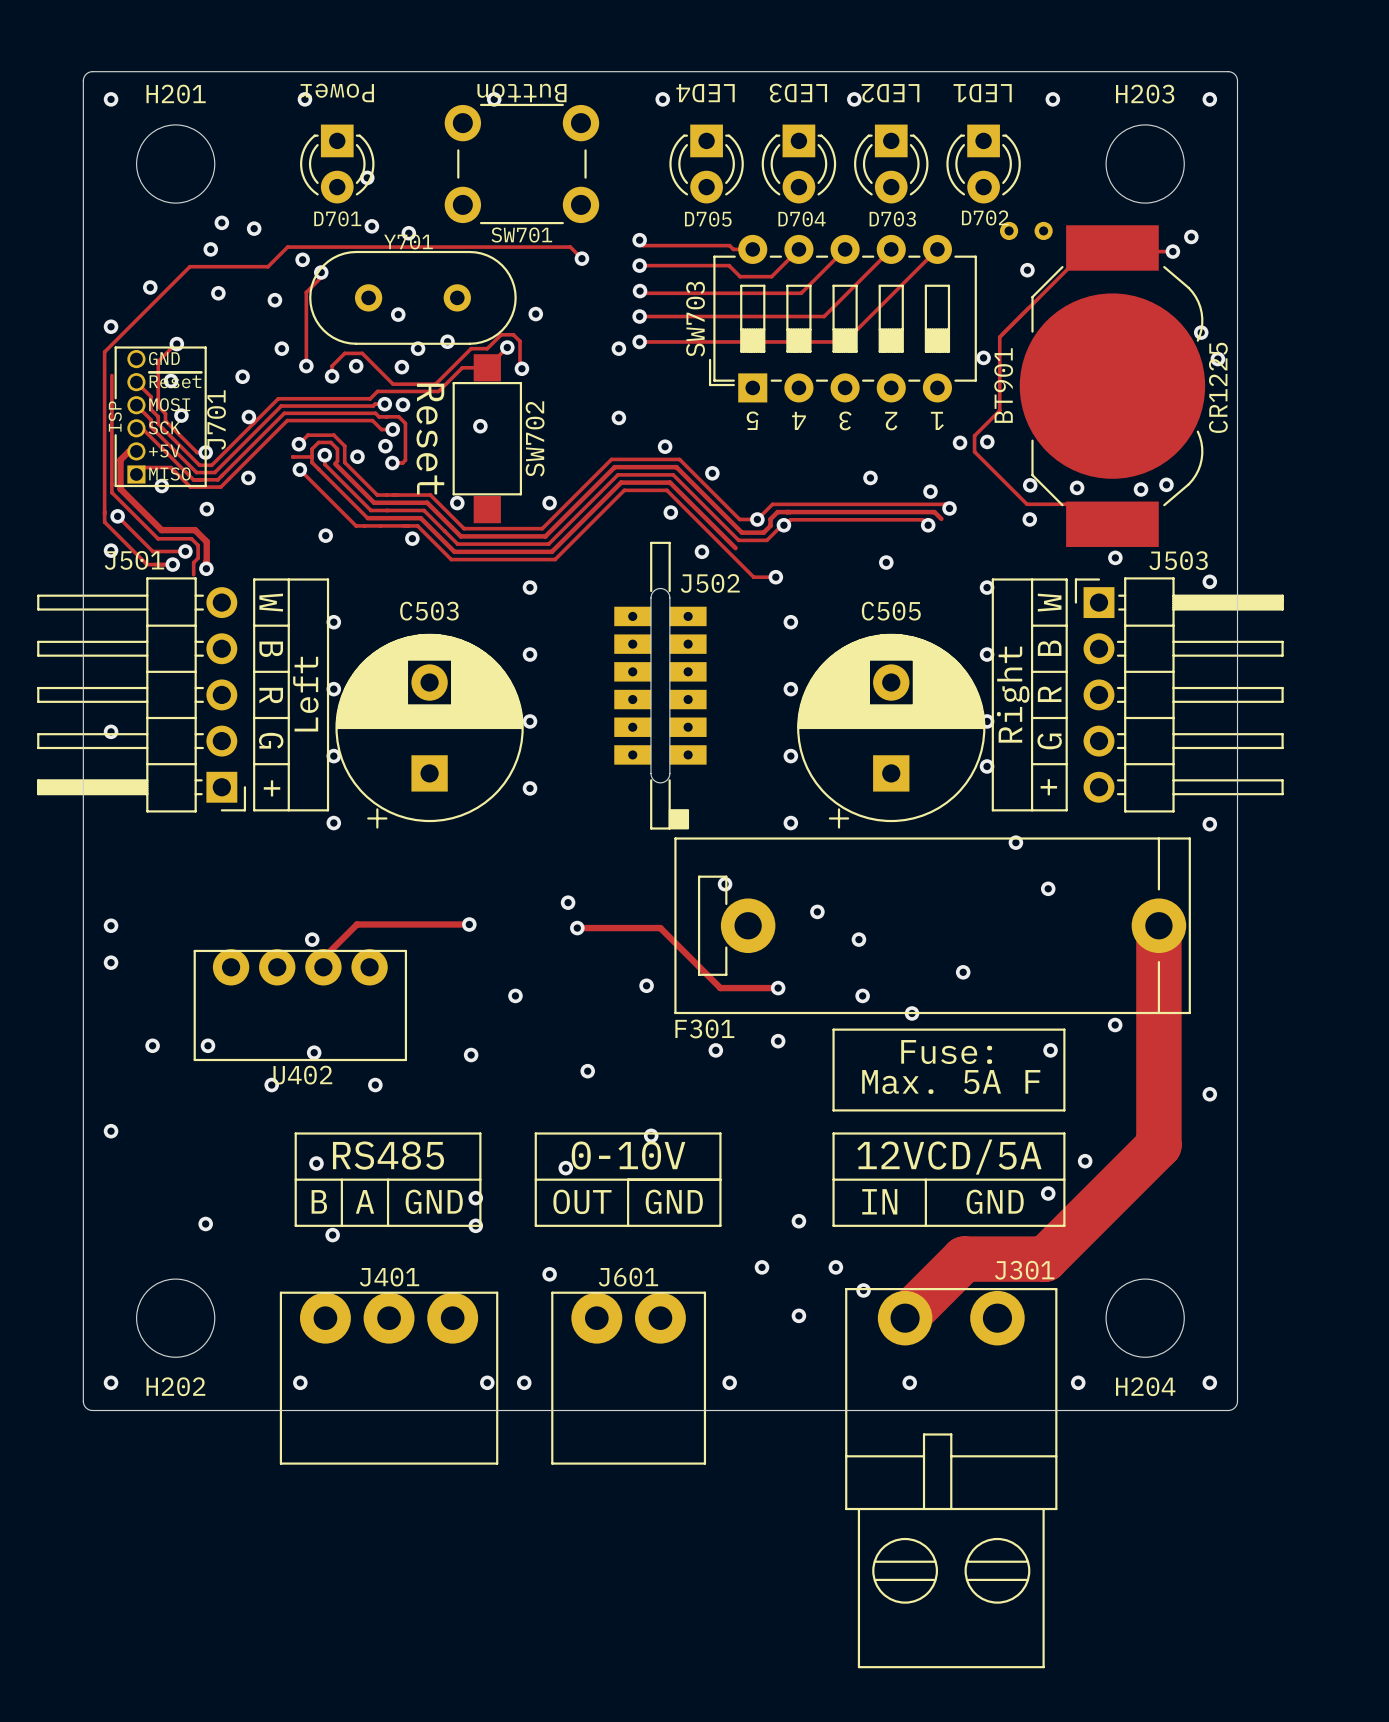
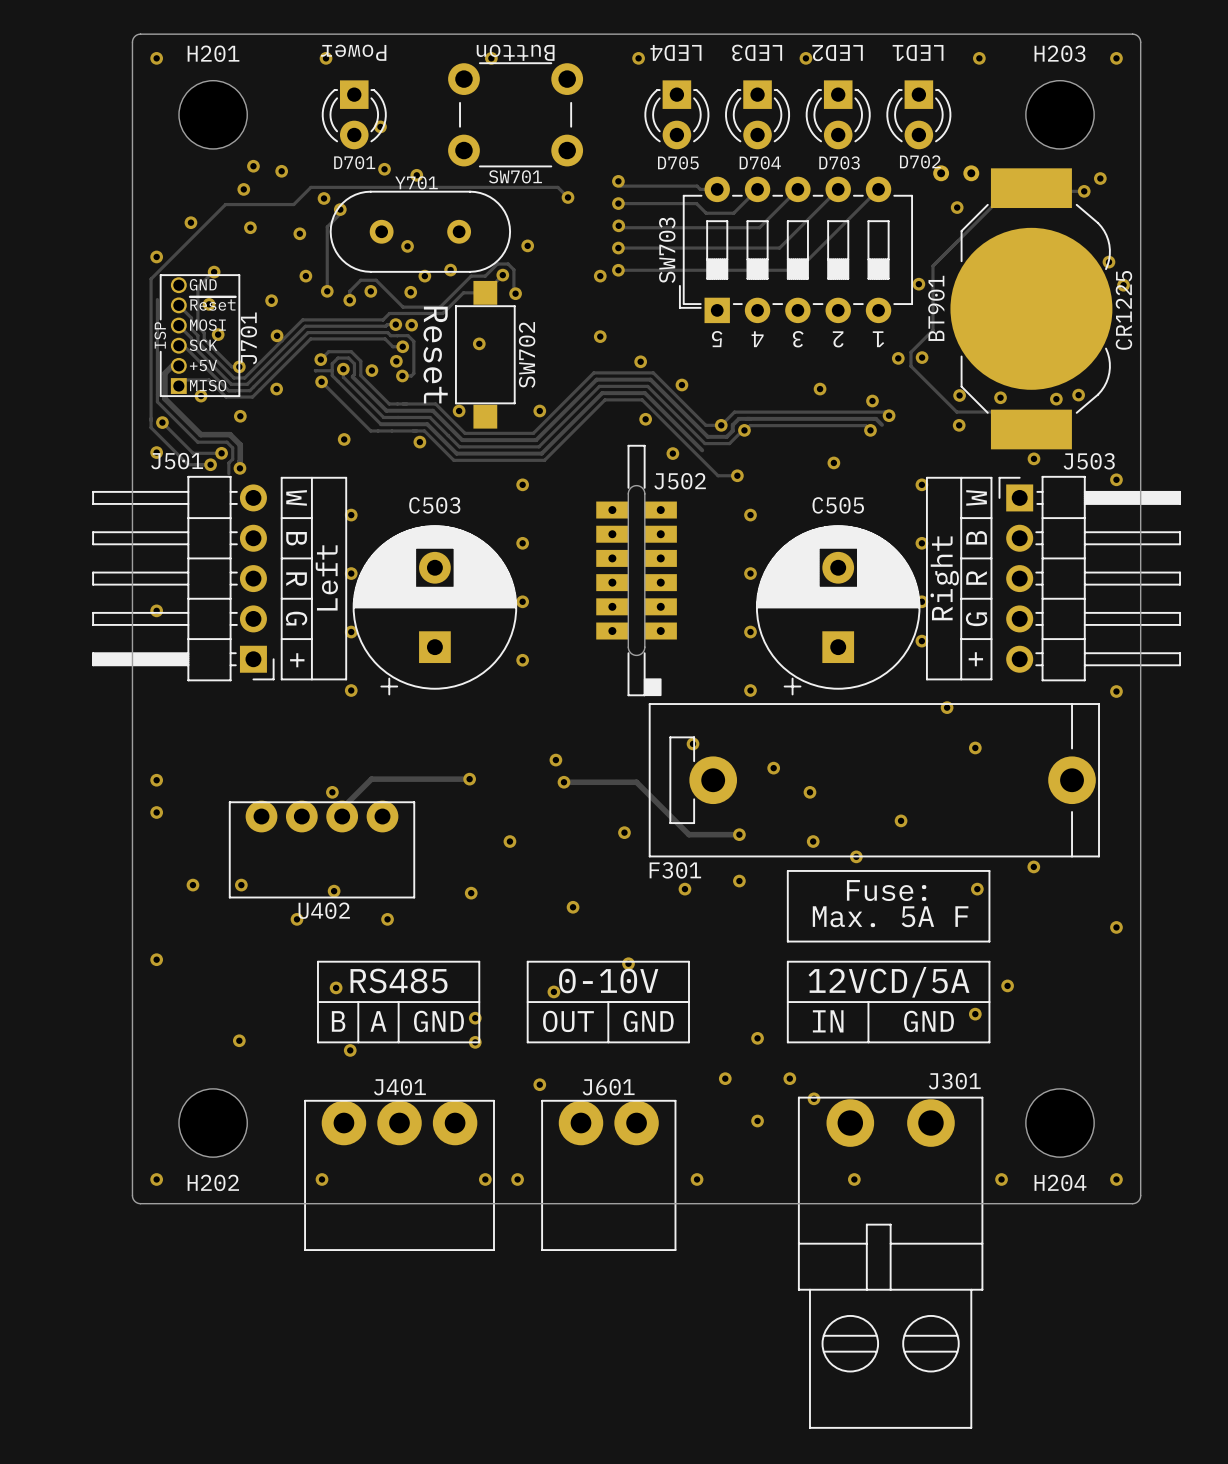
track: (1158, 925) (1158, 1145) (1045, 1259) (964, 1259) (905, 1318) -> none

